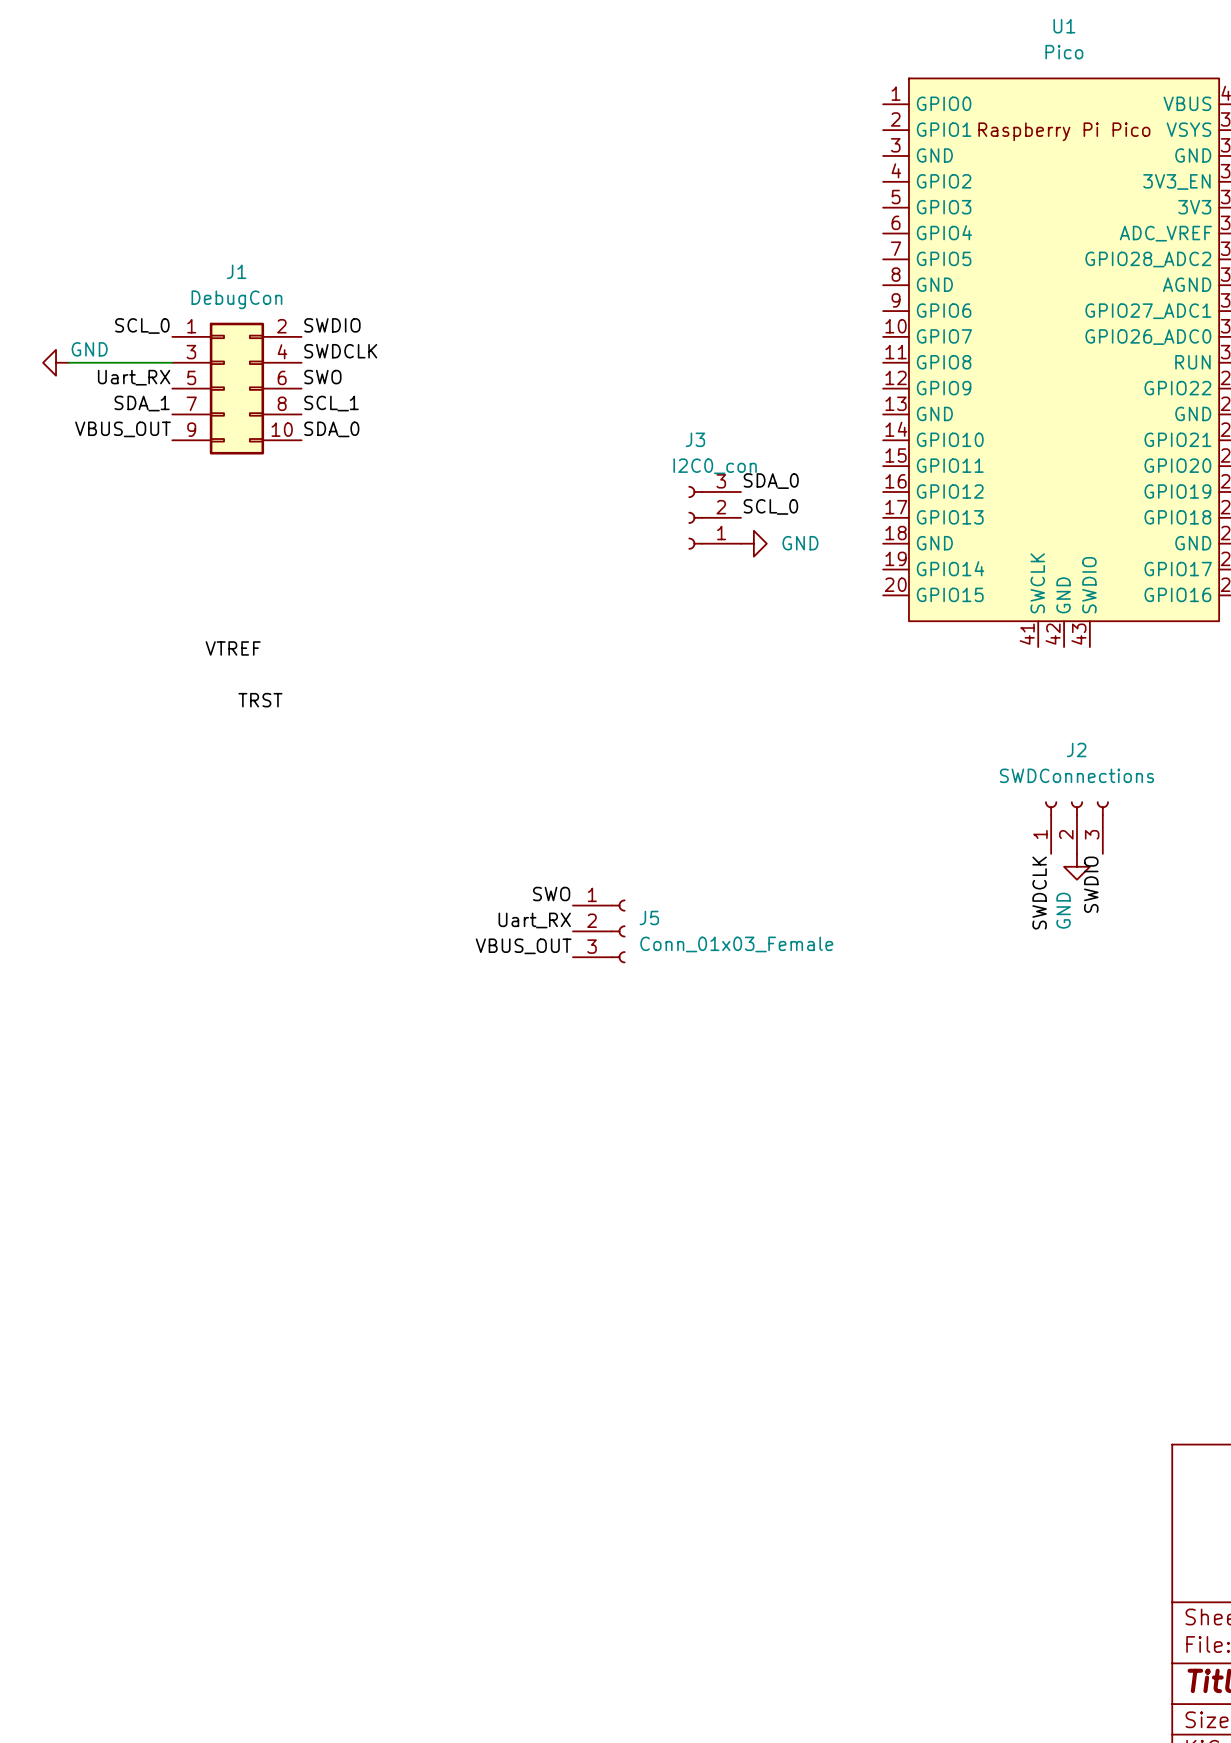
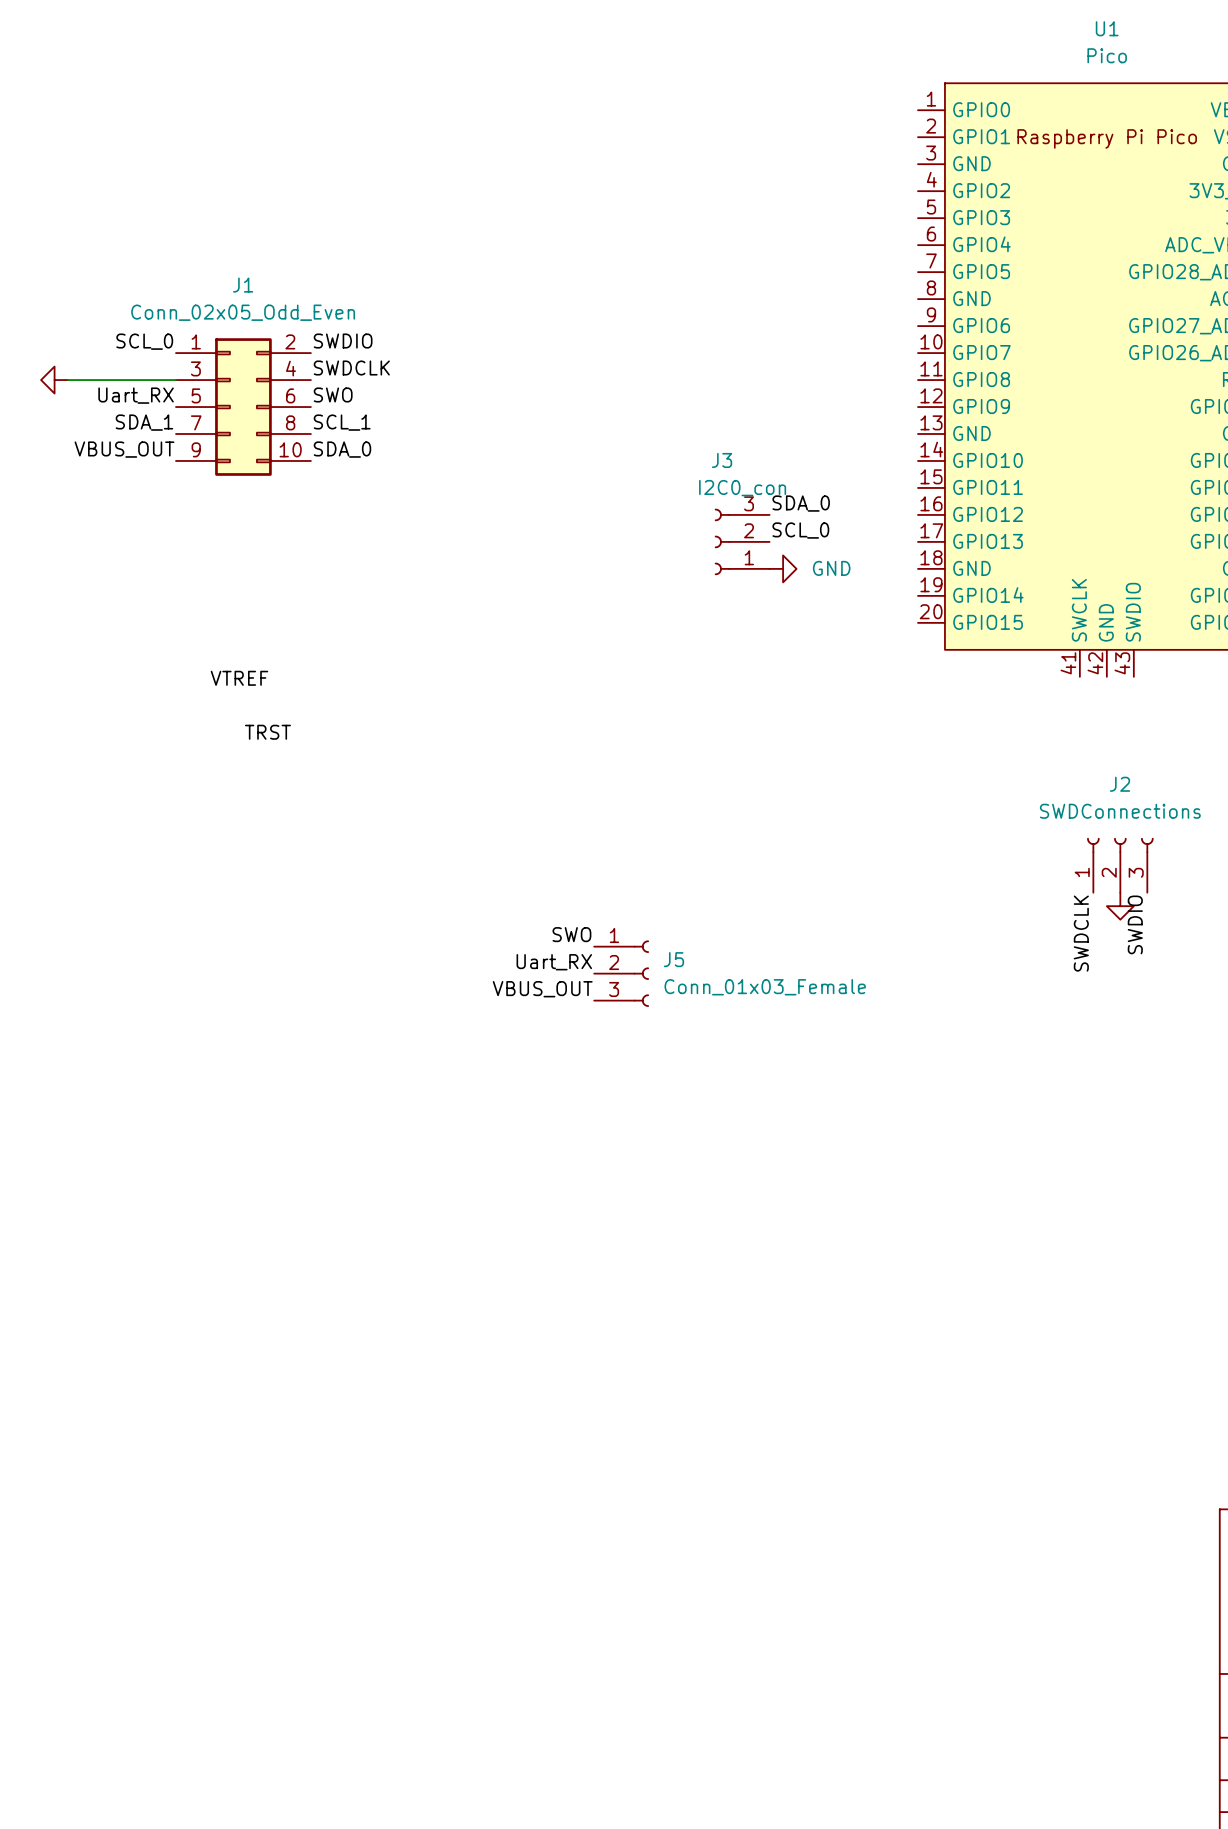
J1 value: DebugCon (236, 299) -> Conn_02x05_Odd_Even (243, 312)
power symbol text: GND (89, 349) -> none
power symbol text: GND (1063, 910) -> none

